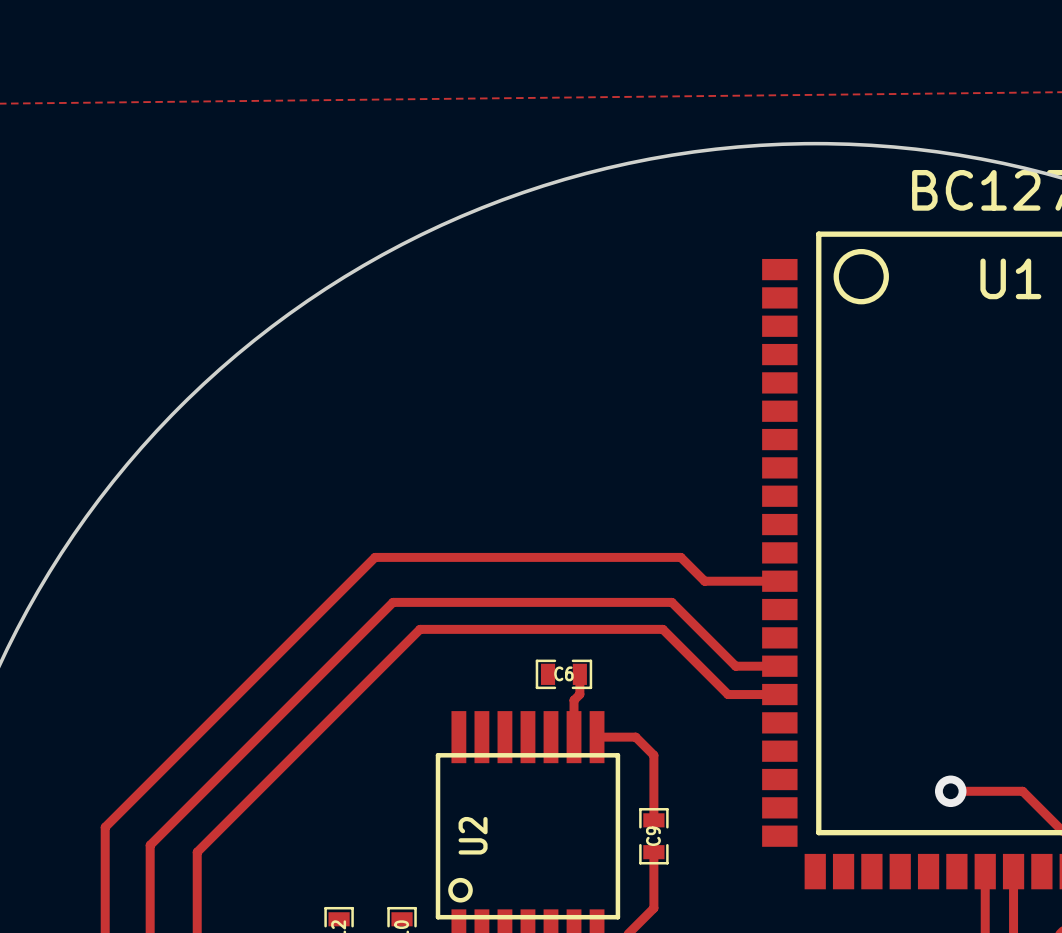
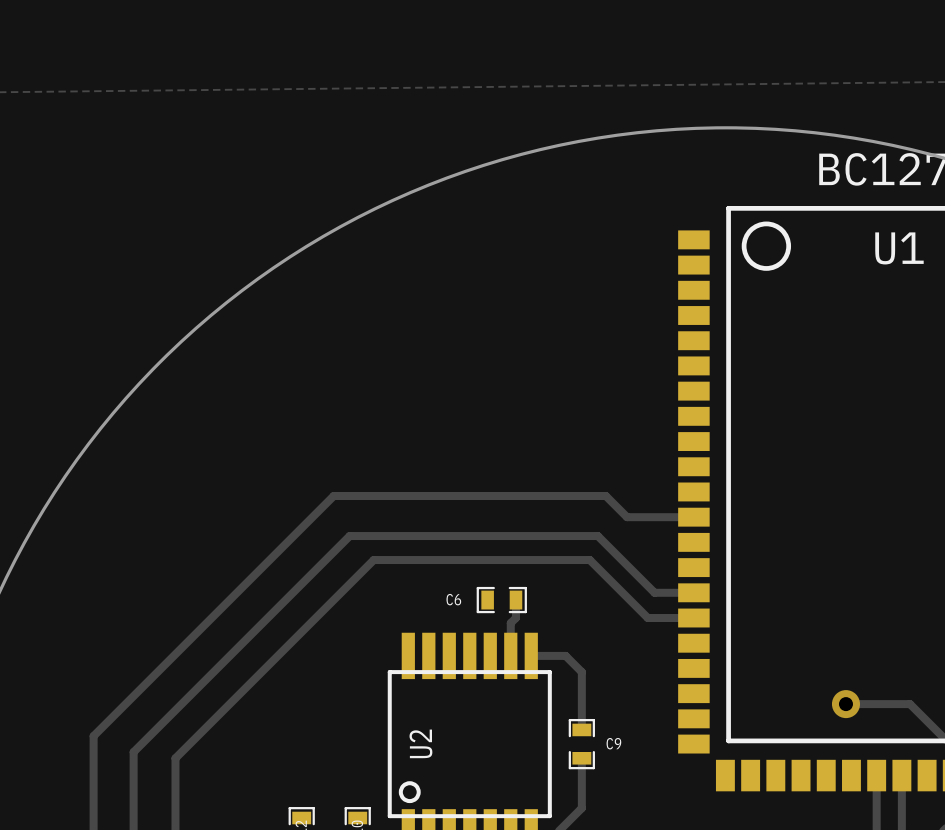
C6 name position: C6 (563, 673) -> C6 (453, 599)
C9 name rotation: 0° (653, 836) -> 90° clockwise (613, 743)
C9 name position: C9 (653, 836) -> C9 (613, 743)

